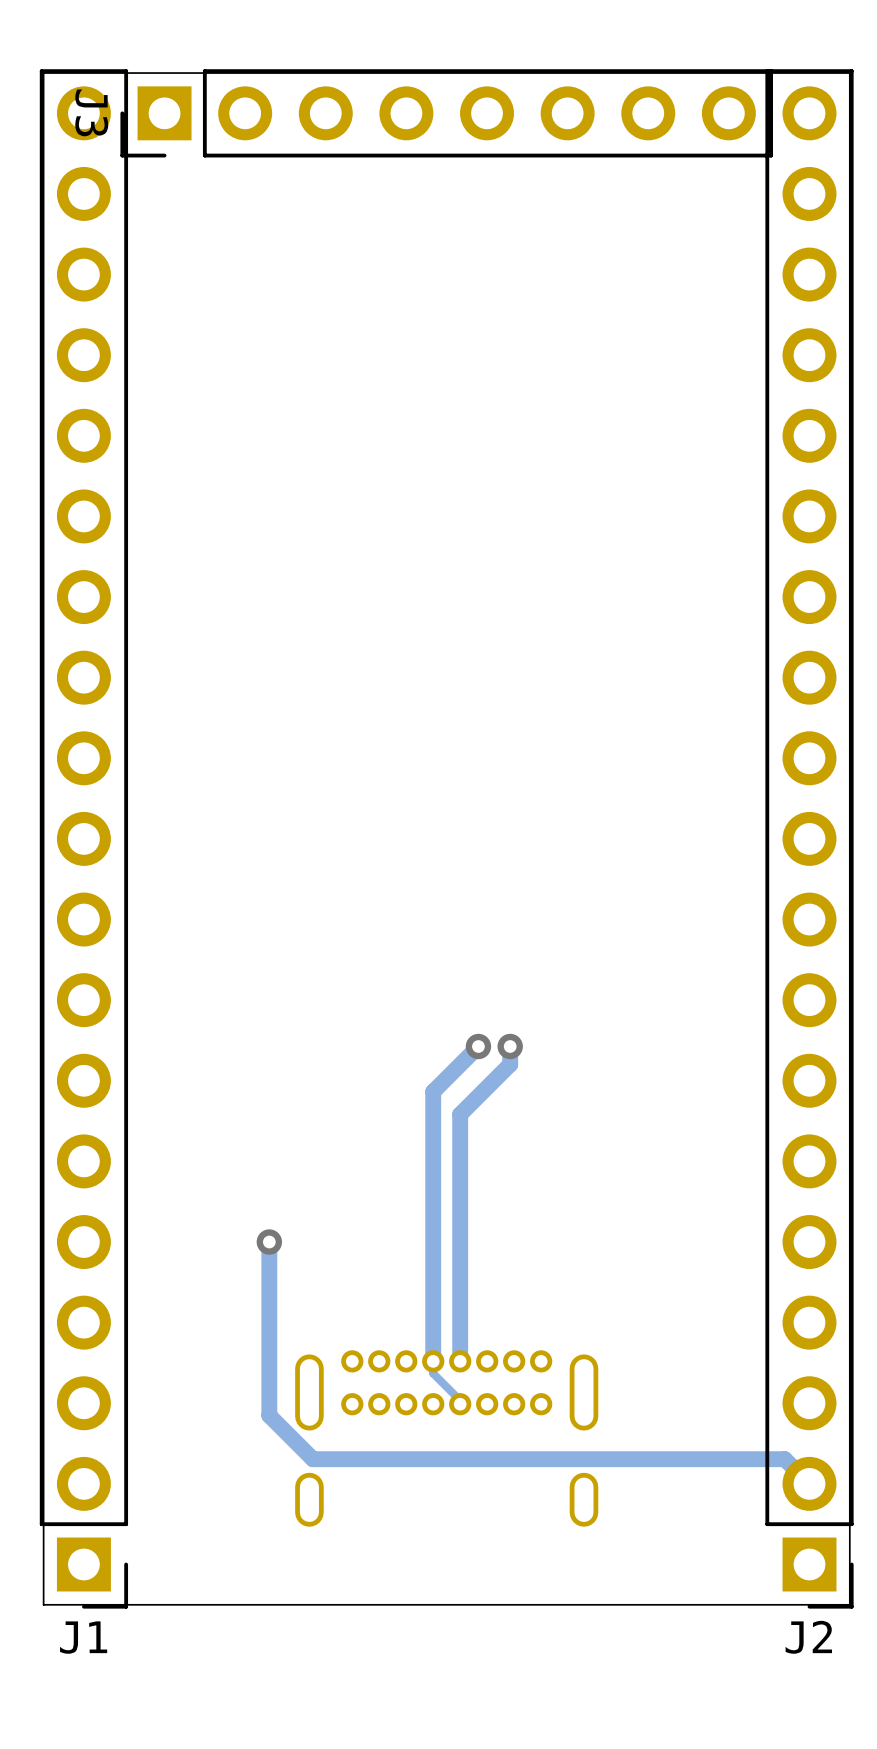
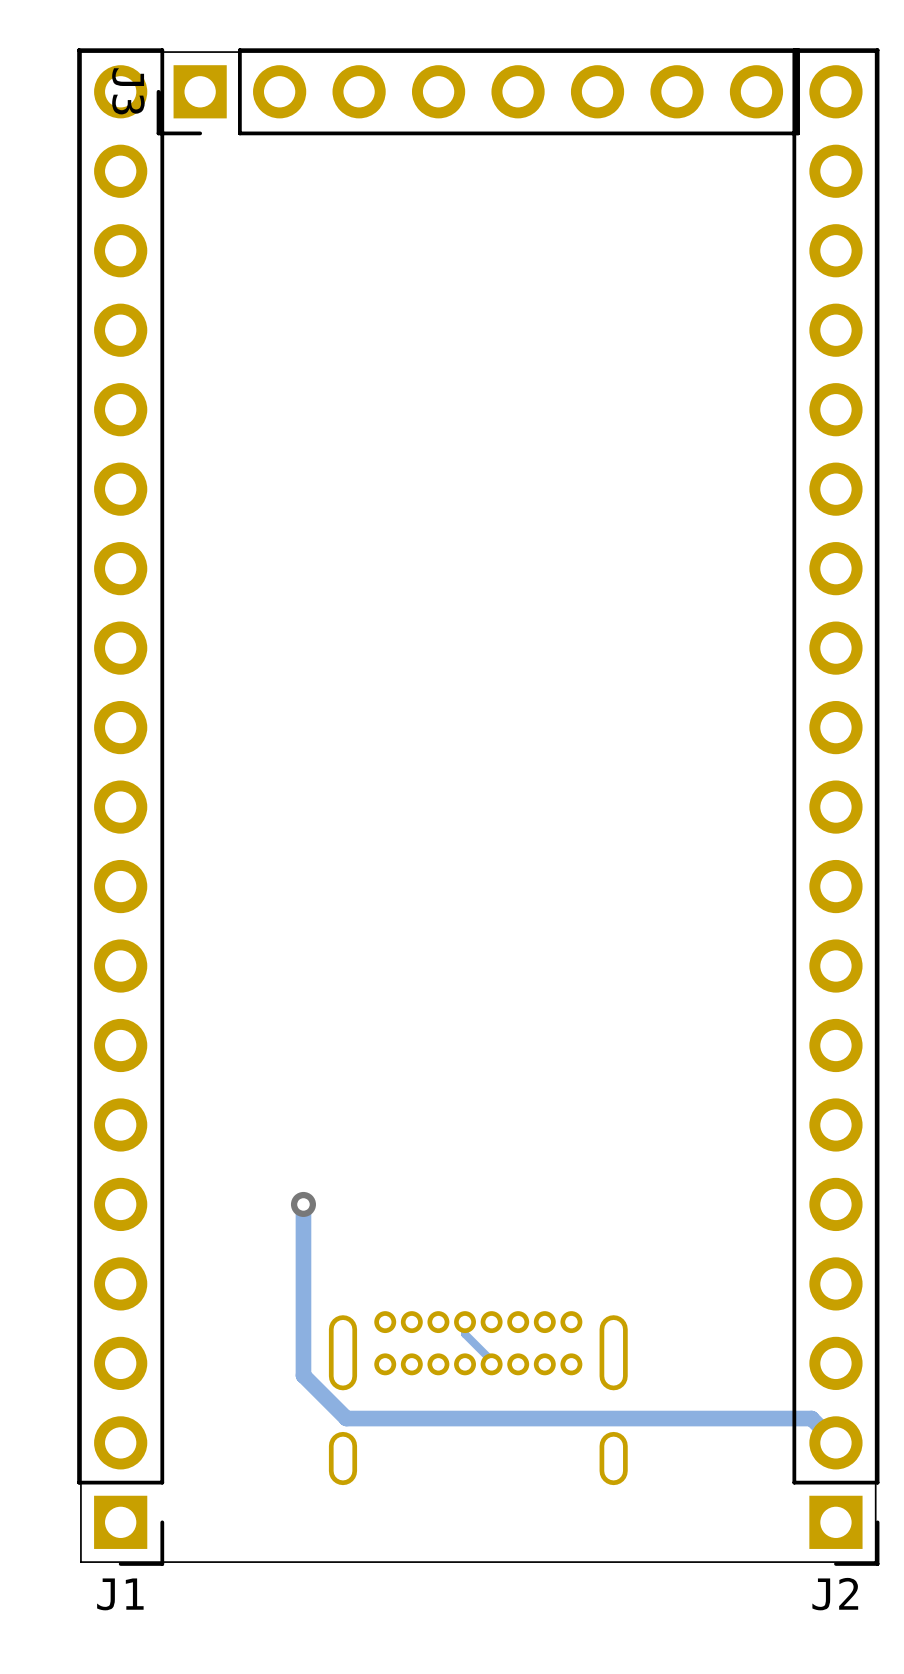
track: (478, 1046) (433, 1091) (433, 1361) -> none
via: (478, 1046) -> none
track: (510, 1046) (510, 1064) (460, 1114) (460, 1361) -> none
via: (510, 1046) -> none

